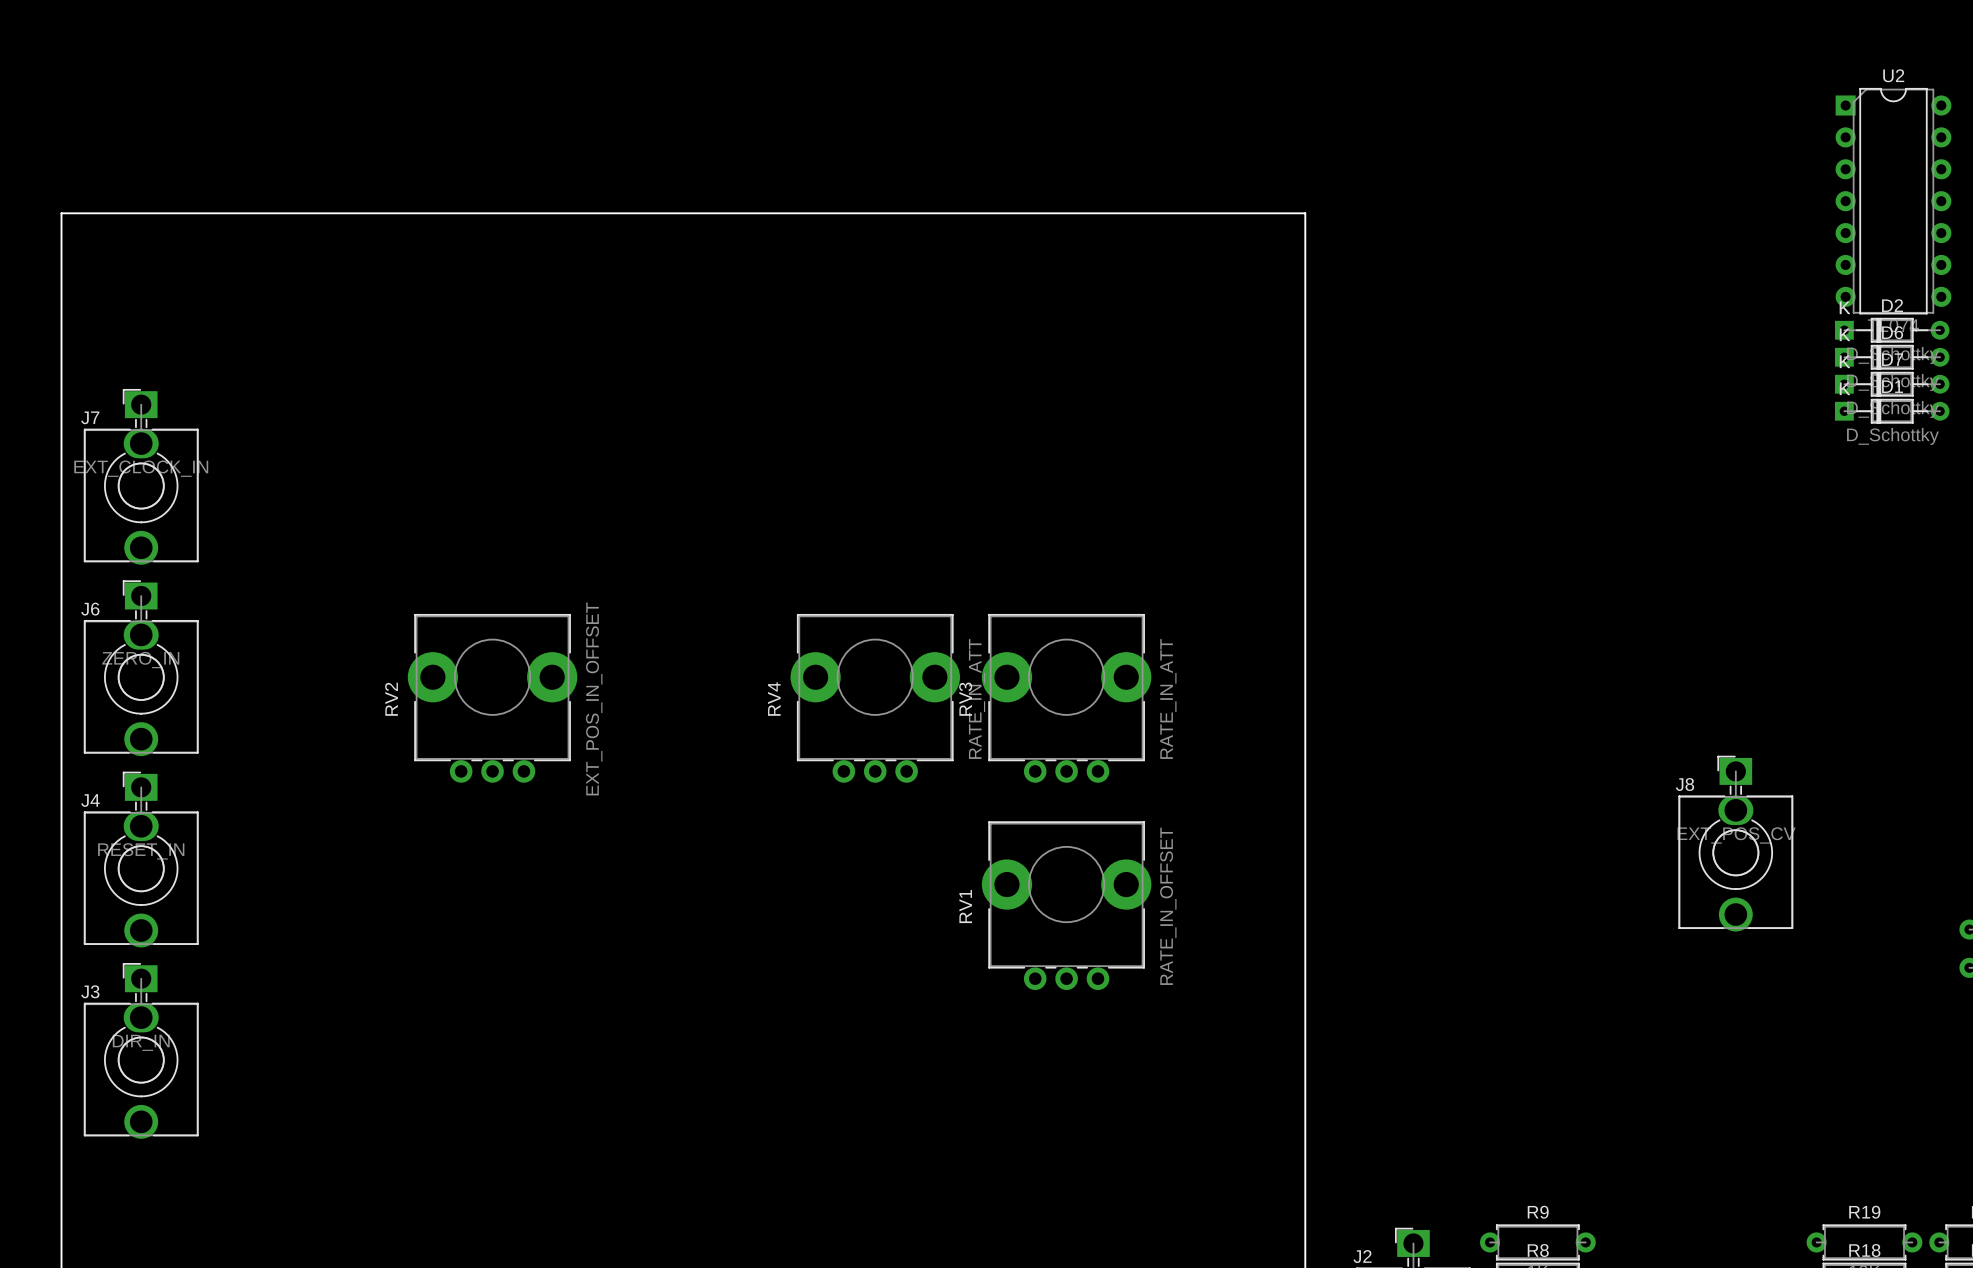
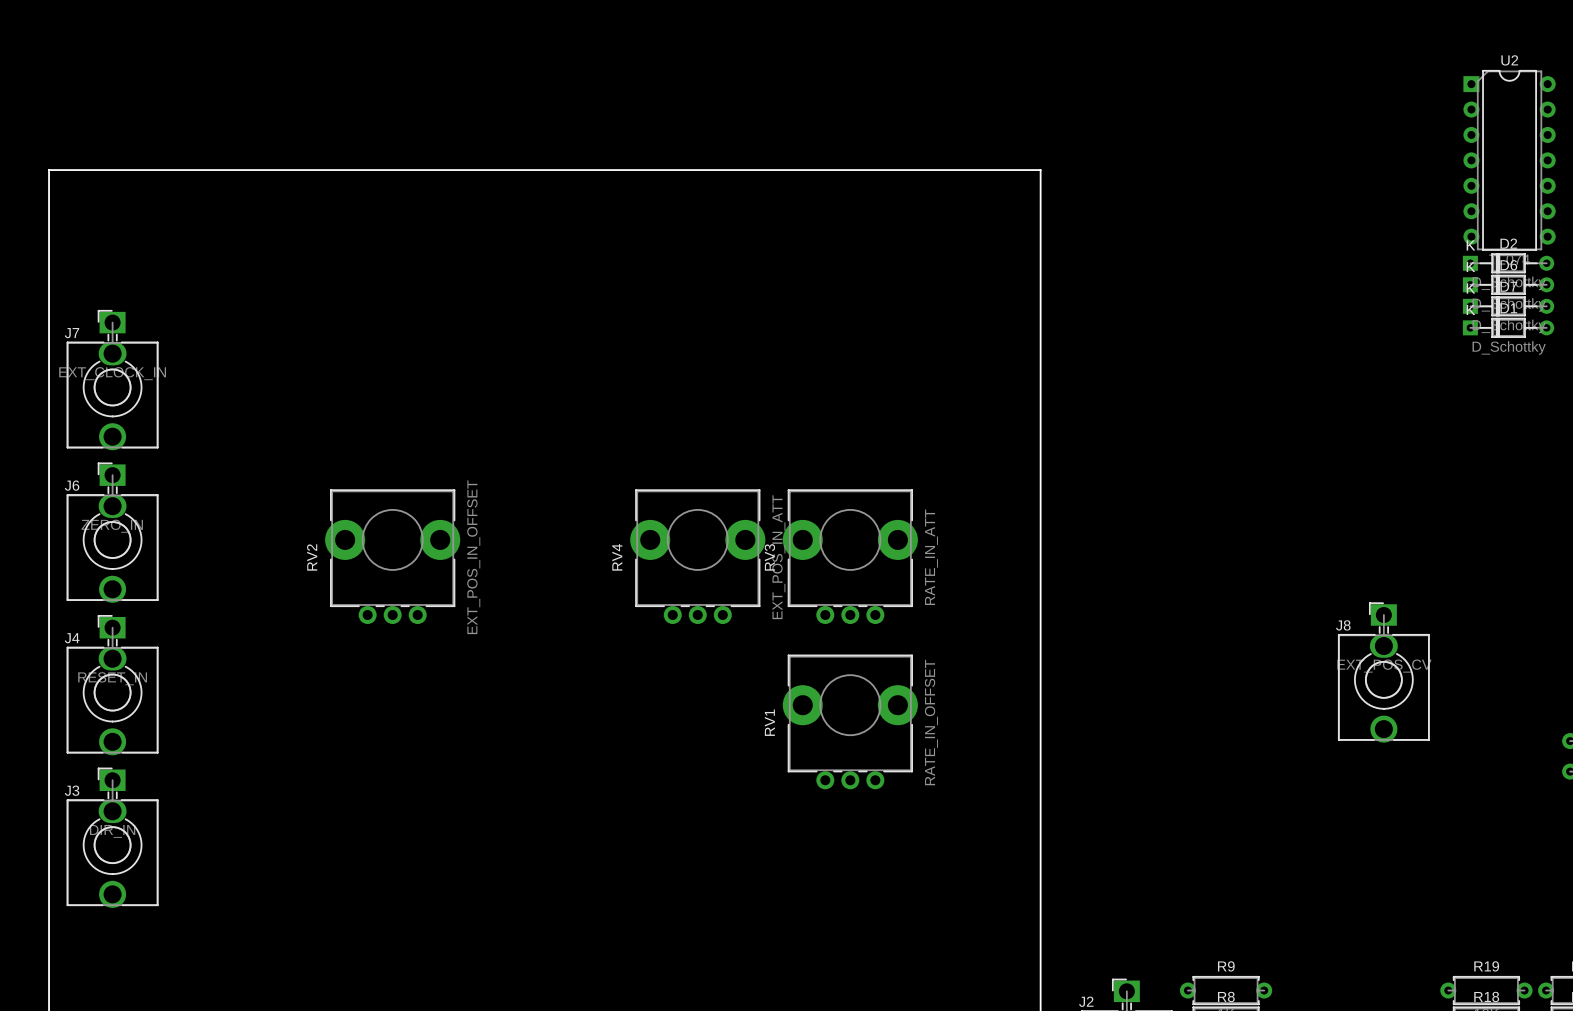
RV4 value: RATE_IN_ATT (977, 698) -> EXT_POS_IN_ATT (778, 557)

